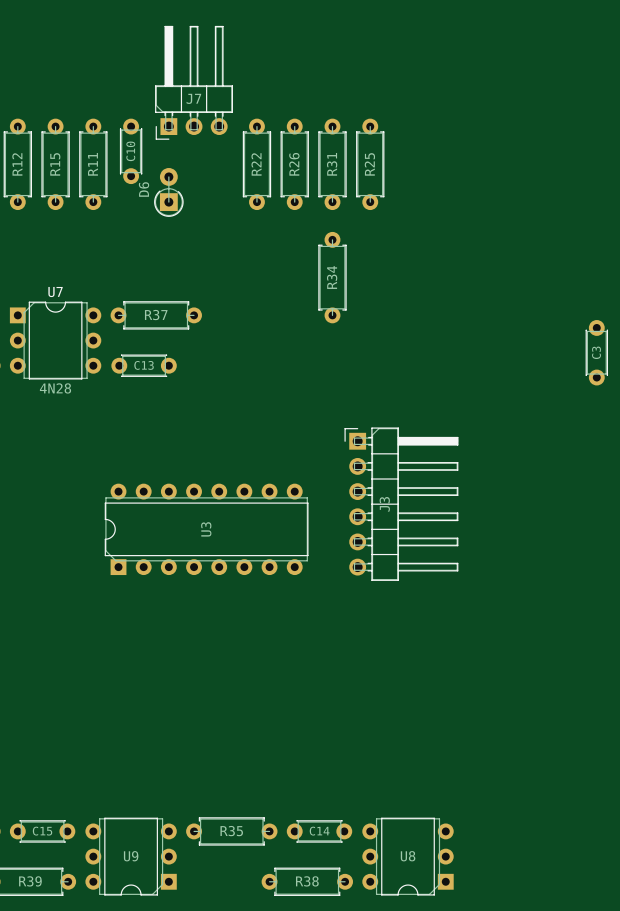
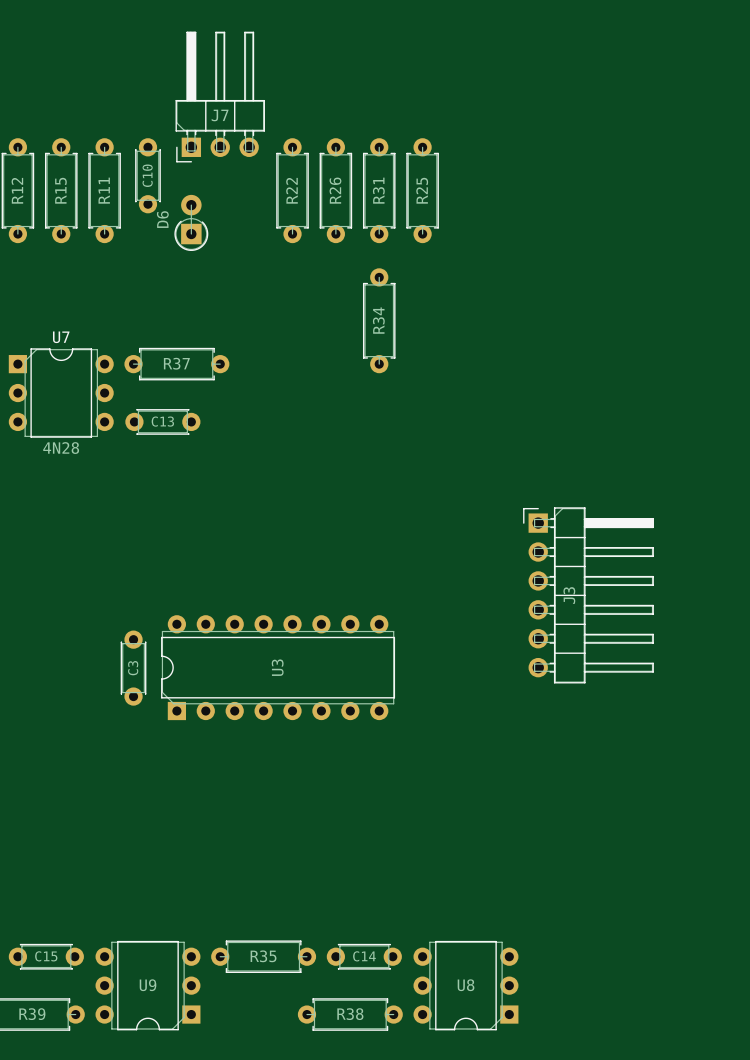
C3 position: (596, 352) -> (133, 668)
J3 position: (401, 504) -> (588, 595)
U3 position: (206, 529) -> (278, 667)

